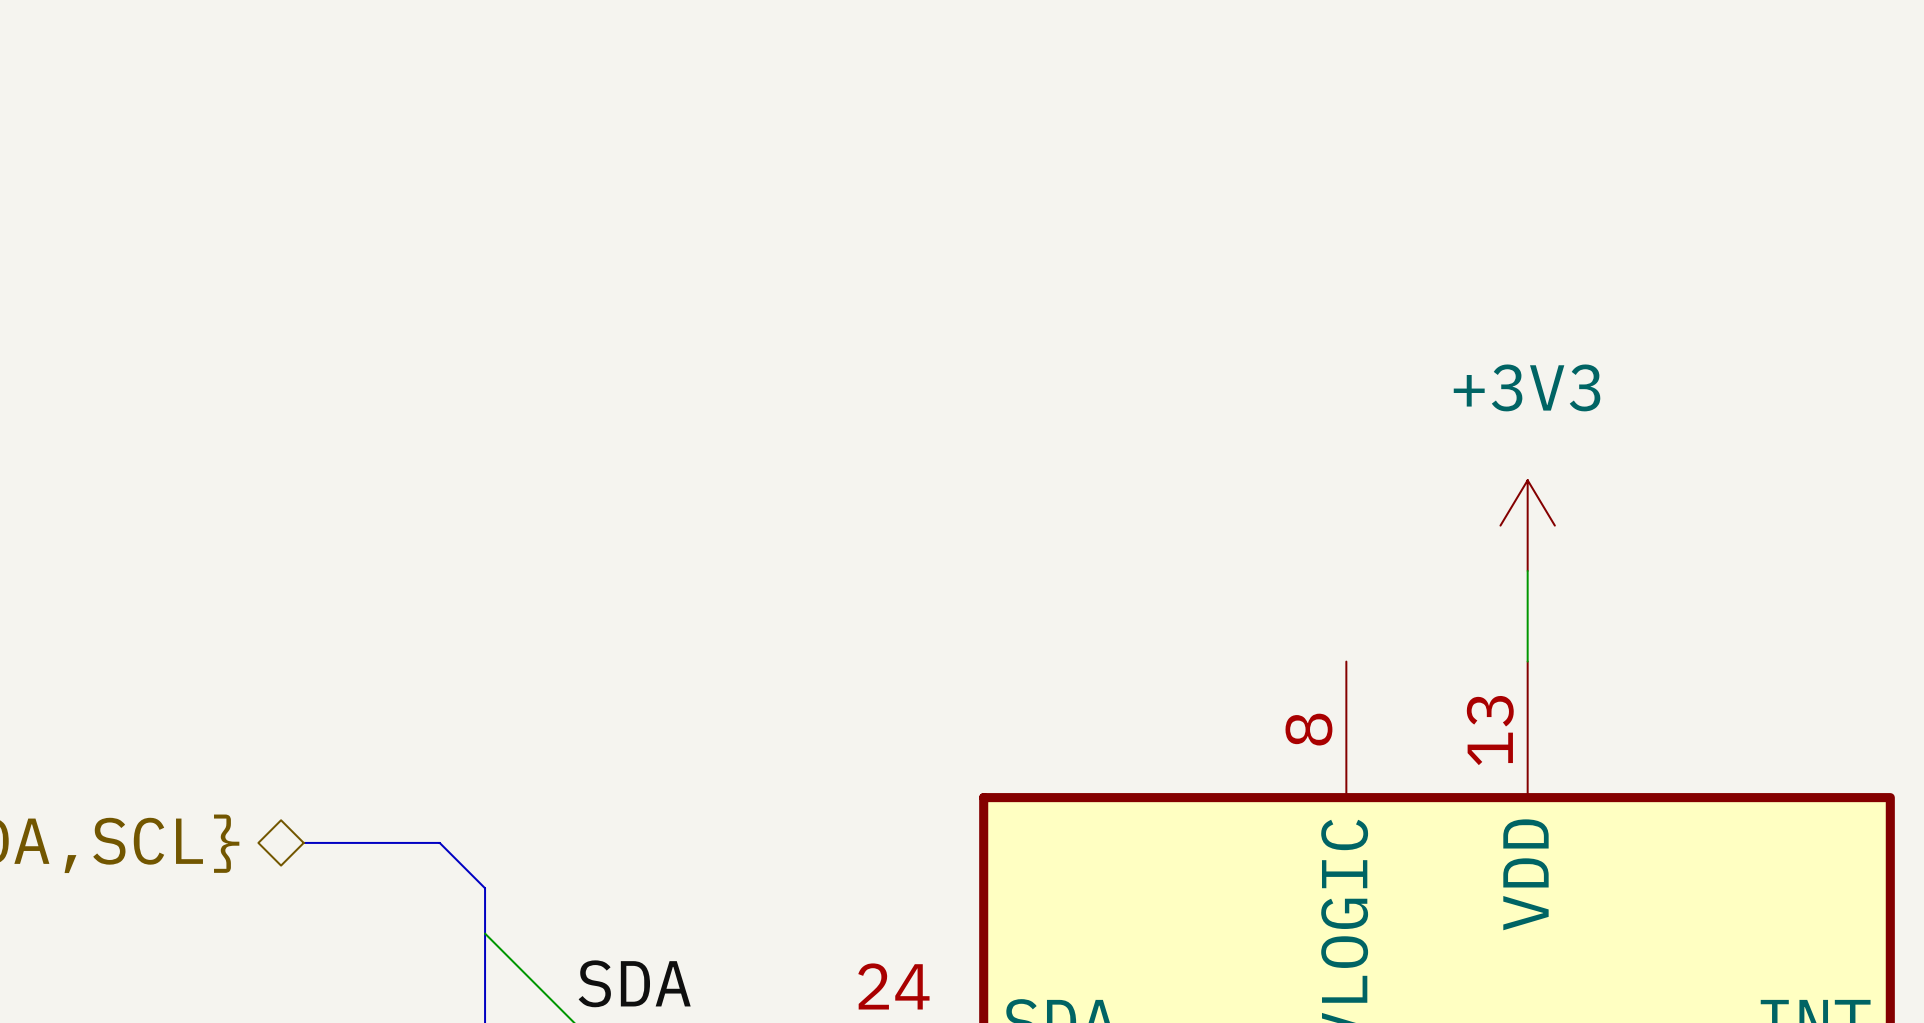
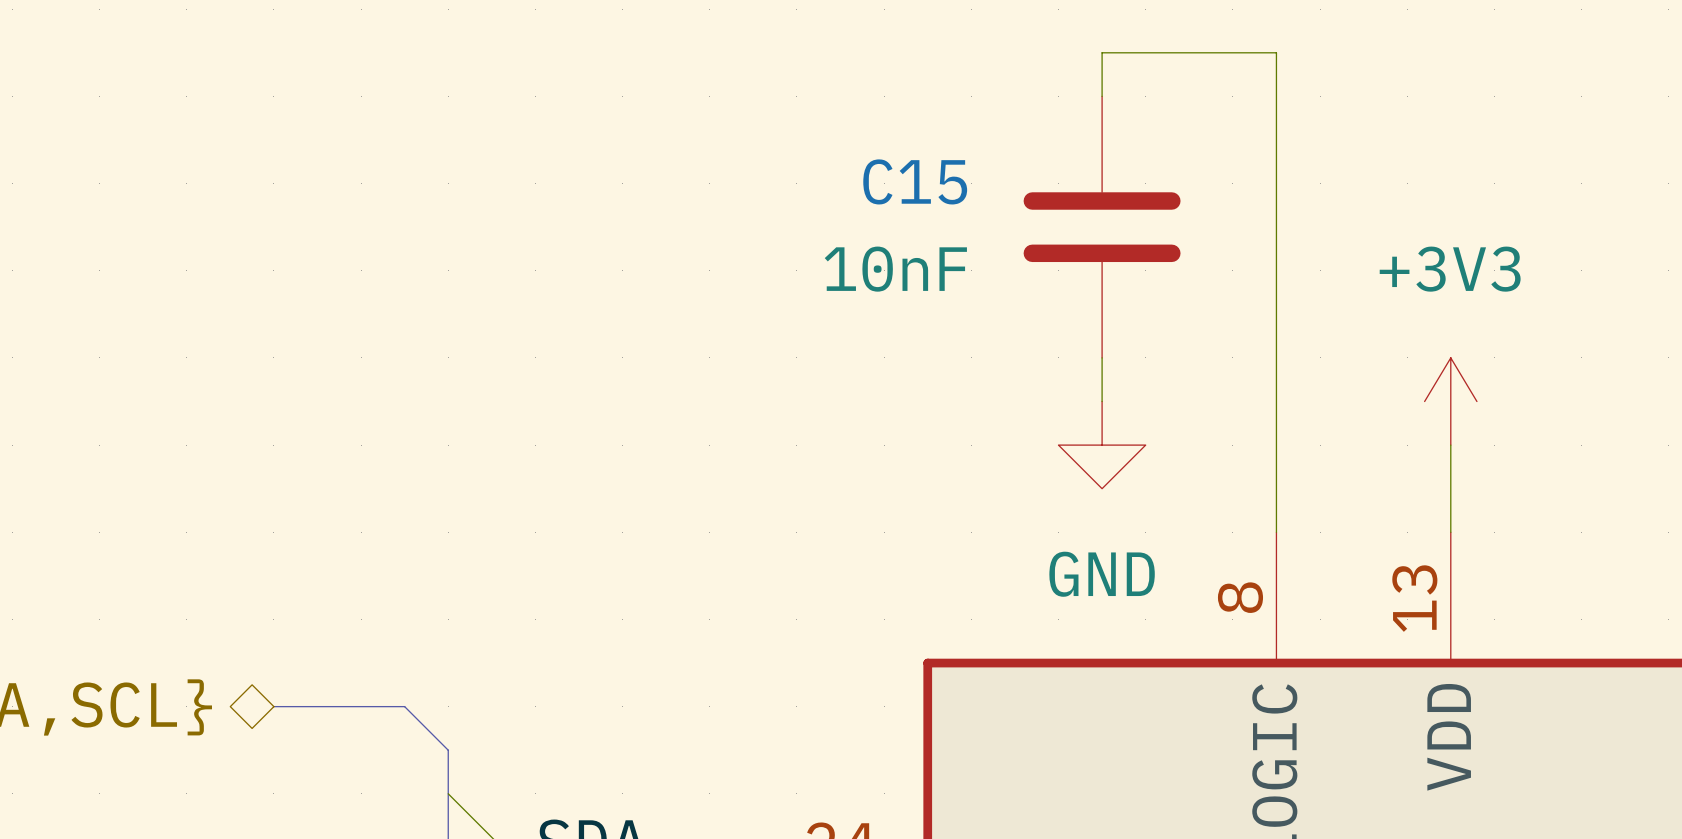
wire: none -> (1102, 96) (1102, 52) (1276, 52) (1276, 532)
C15: none -> 10nF (1102, 227)
wire: none -> (1102, 357) (1102, 401)
power symbol: none -> GND (1102, 445)

